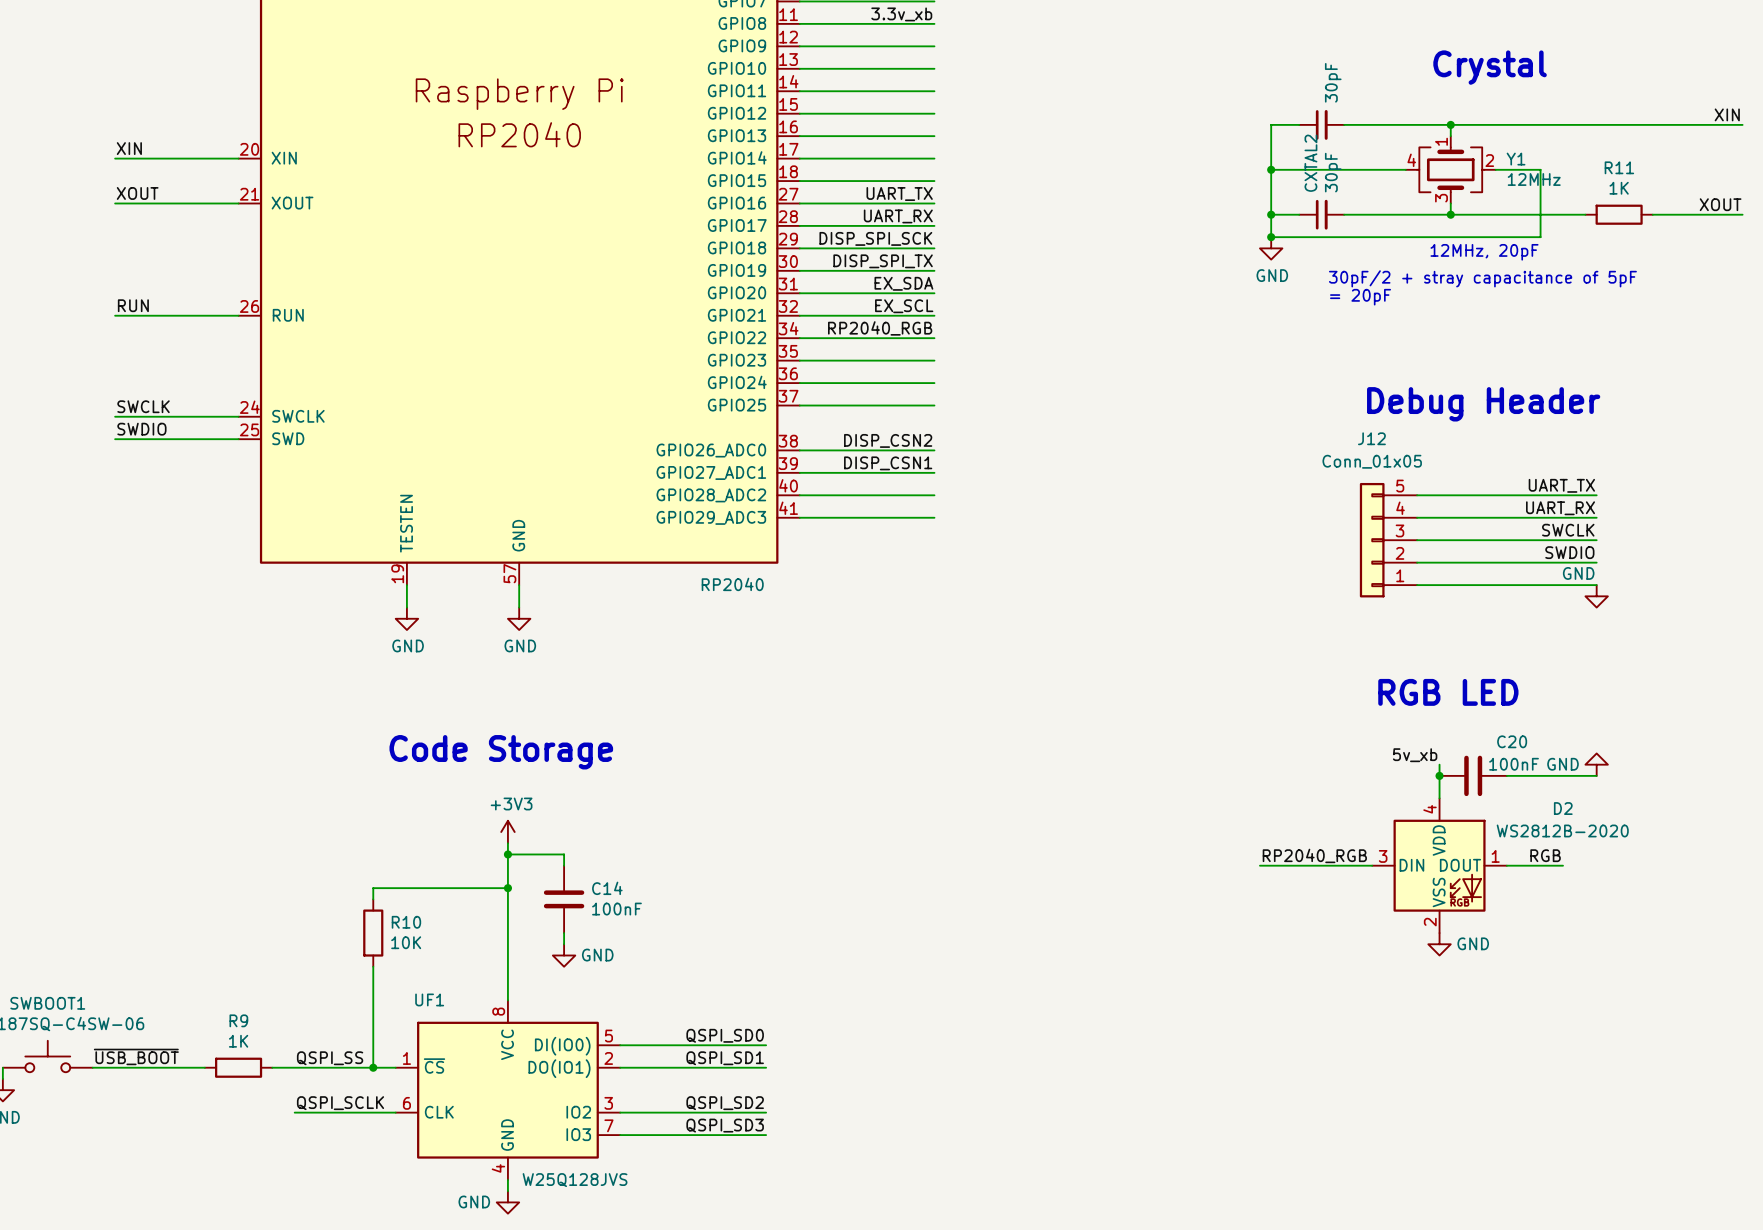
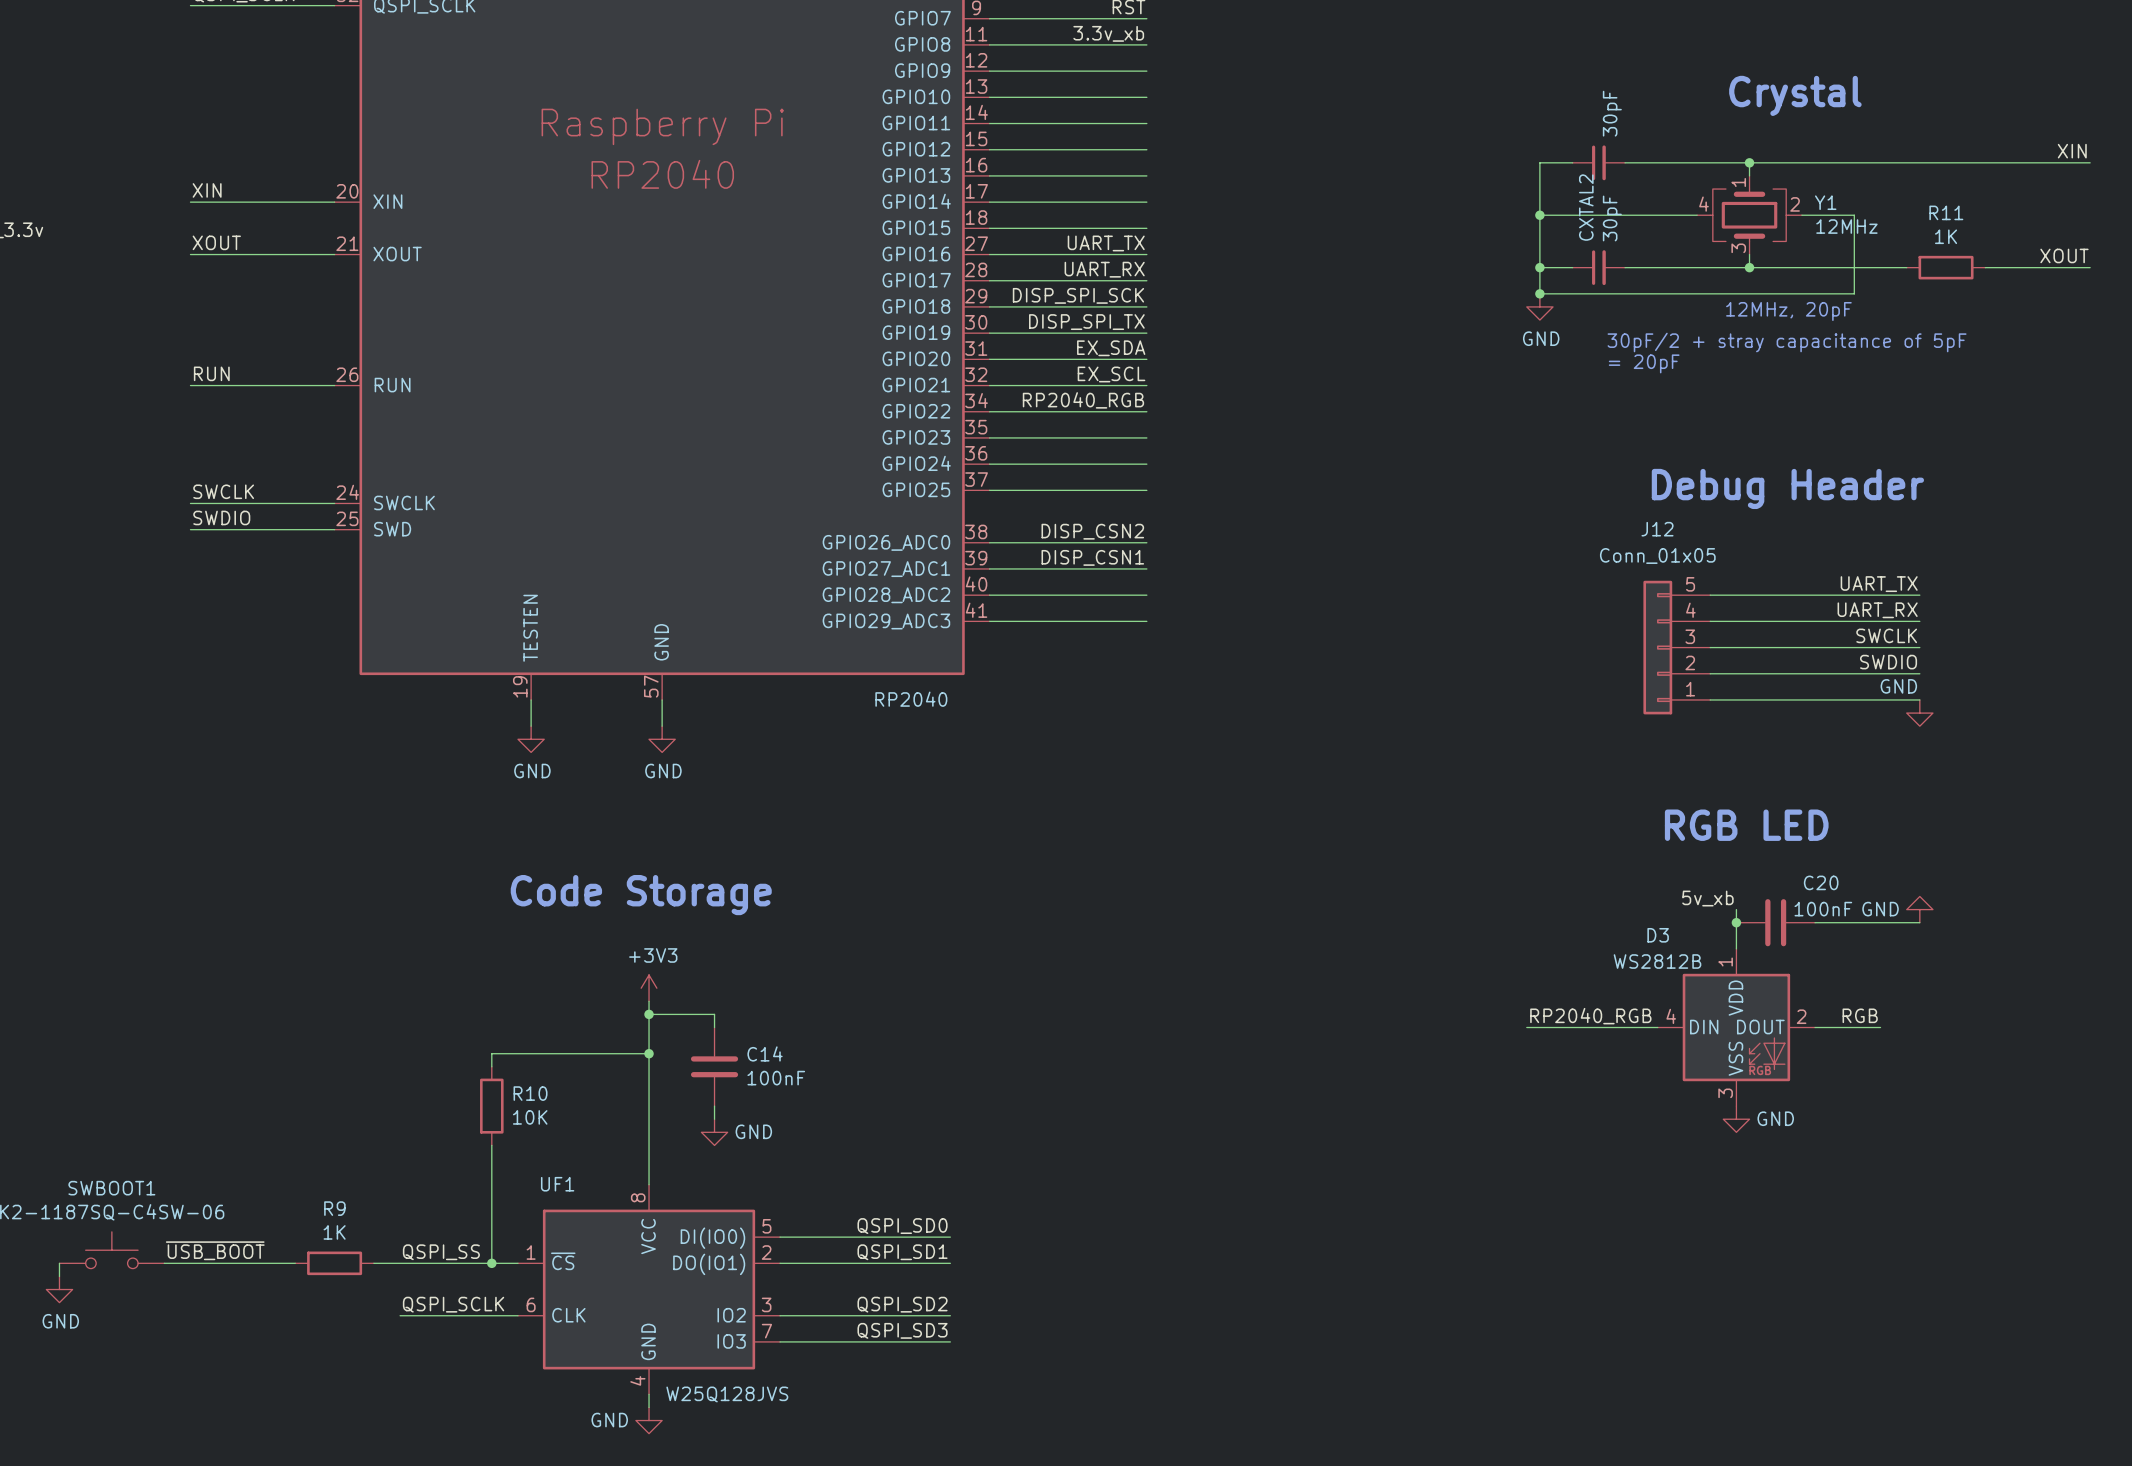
D2 name: D2 (1563, 808) -> D3 (1658, 935)
D2 pin number: 4 (1430, 809) -> 1 (1725, 962)
D2 value: WS2812B-2020 (1562, 830) -> WS2812B (1657, 961)
D2 pin number: 3 (1383, 856) -> 4 (1671, 1016)
D2 pin number: 1 (1495, 856) -> 2 (1801, 1016)
D2 pin number: 2 (1430, 922) -> 3 (1725, 1093)

